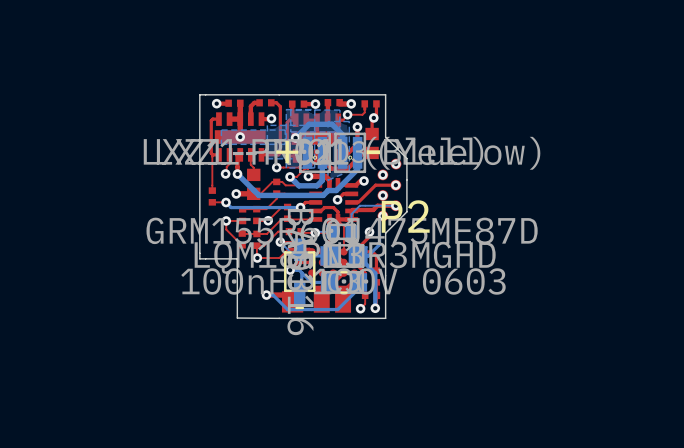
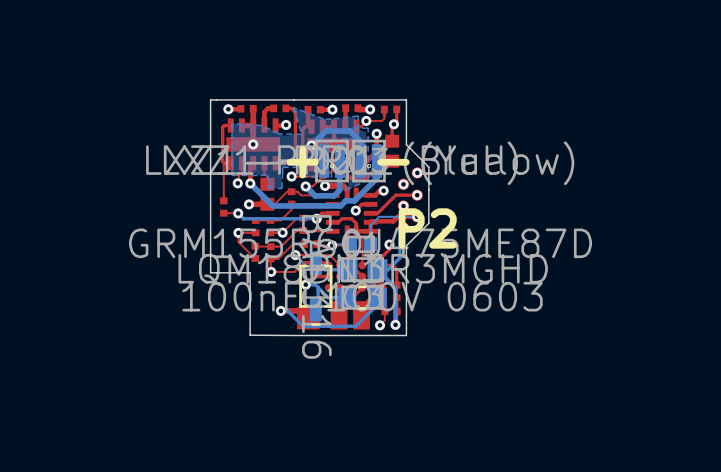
bottom zone outline: (339, 110) (290, 110) (290, 131) (314, 131) (314, 124) (314, 109) (286, 109) (286, 158) (305, 158) (305, 125) (267, 125) (268, 158) -> (358, 115) (323, 119) (293, 107) (301, 134) (279, 133) (262, 125) (231, 123) (232, 150)
bottom zone outline: (285, 130) (221, 130) (221, 144) (285, 144) (285, 130) -> none
bottom zone outline: none -> (231, 150) (231, 175) (268, 175) (268, 188) (281, 188) (282, 175)
bottom zone outline: none -> (282, 167) (282, 175)

